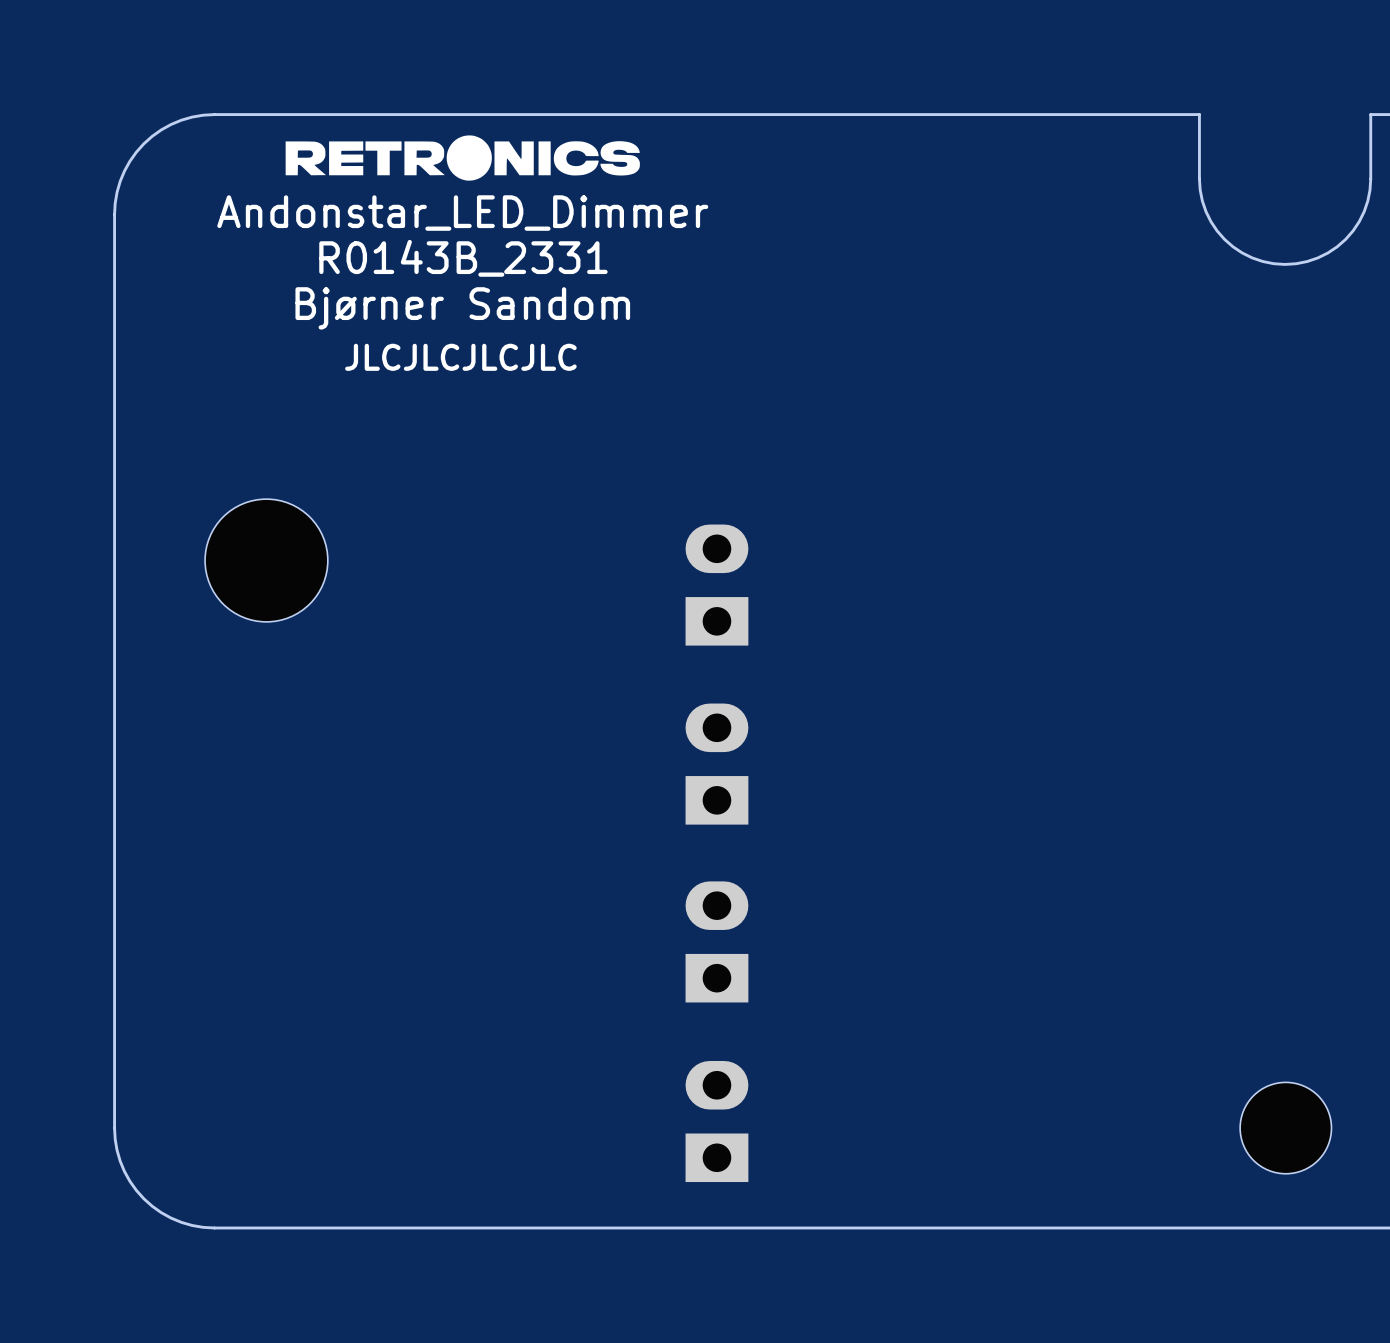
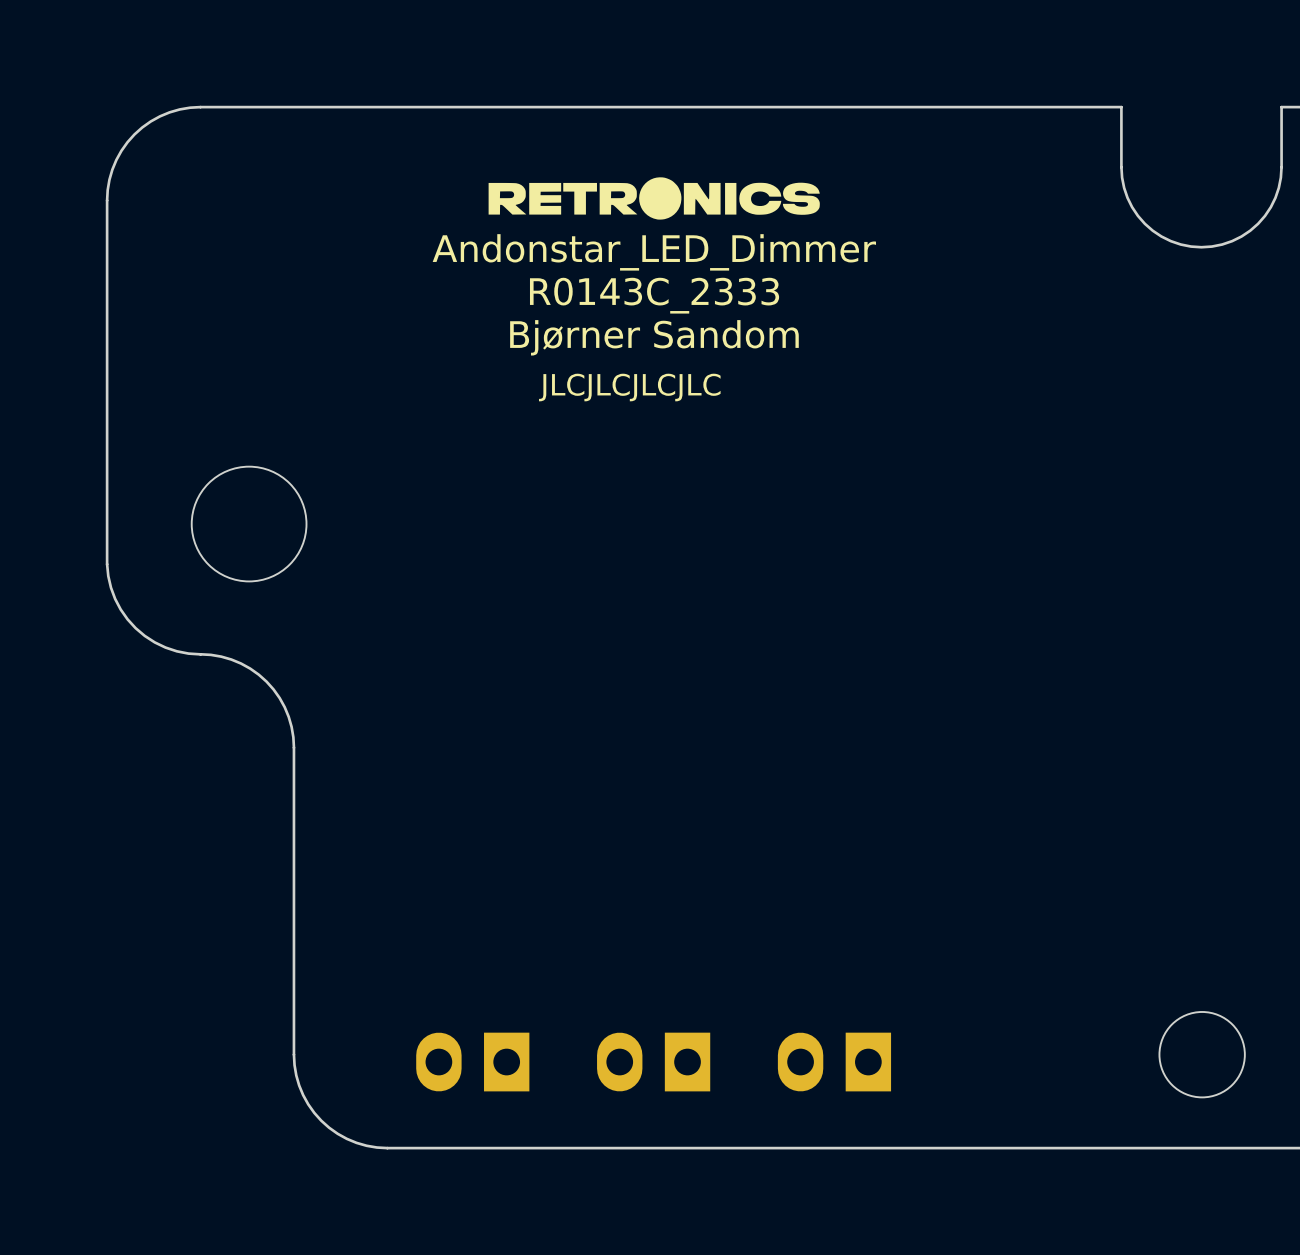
drawing position: (462, 158) -> (654, 198)
text position: Andonstar_LED_Dimmer (462, 213) -> Andonstar_LED_Dimmer (654, 252)
text: R0143B_2331 (463, 258) -> R0143C_2333 (654, 295)
text position: Bjørner Sandom (462, 308) -> Bjørner Sandom (654, 337)
text position: JLCJLCJLCJLC (460, 357) -> JLCJLCJLCJLC (629, 387)
part: (716, 585) -> none
board edge: (114, 603) (114, 1128) (117, 1150) (124, 1171) (136, 1190) (152, 1206) (171, 1218) (192, 1225) (214, 1228) (414, 1228) -> (107, 564) (110, 587) (120, 609) (135, 628) (144, 635) (165, 647) (176, 651) (221, 656) (241, 663) (266, 681) (284, 707) (291, 726) (293, 747) (293, 1054) (296, 1075) (308, 1104) (329, 1127) (356, 1142) (387, 1148)
part: (716, 764) -> none
part: (716, 941) -> none
part rotation: 0° (716, 1121) -> 90° counterclockwise (653, 1062)
part: none -> (472, 1062)
part: none -> (834, 1062)

